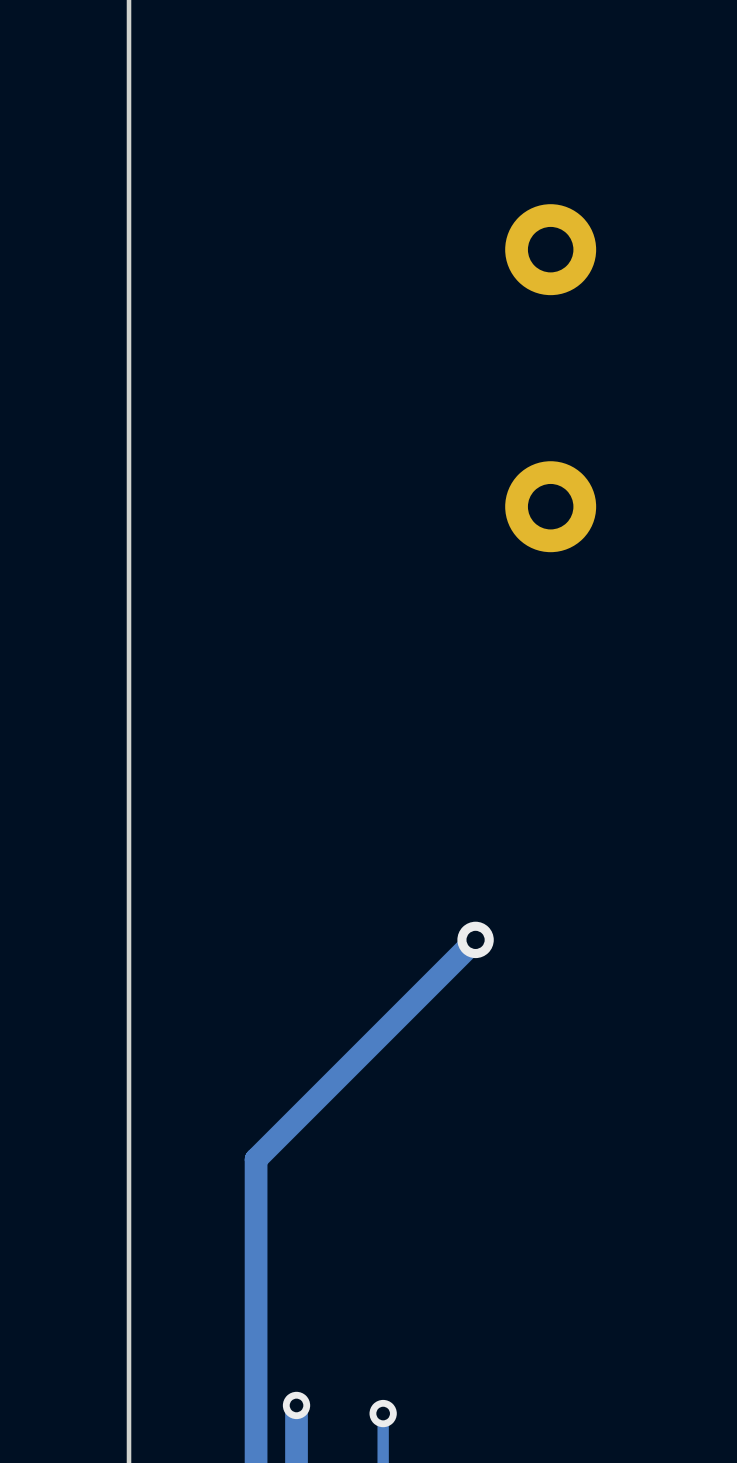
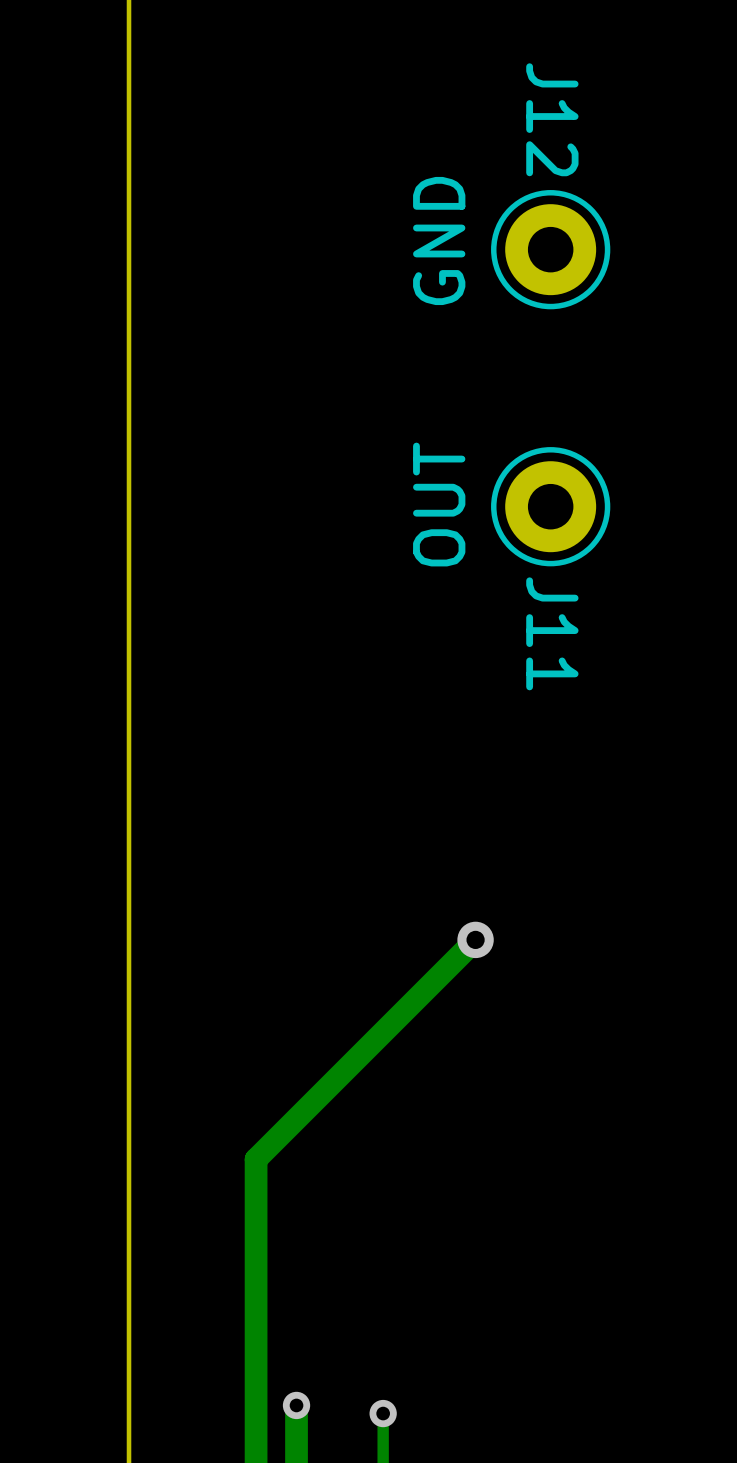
text: none -> GND (439, 240)
J12 side: top (550, 249) -> bottom (550, 249)
text: none -> OUT (439, 504)
J11 side: top (550, 506) -> bottom (550, 506)

